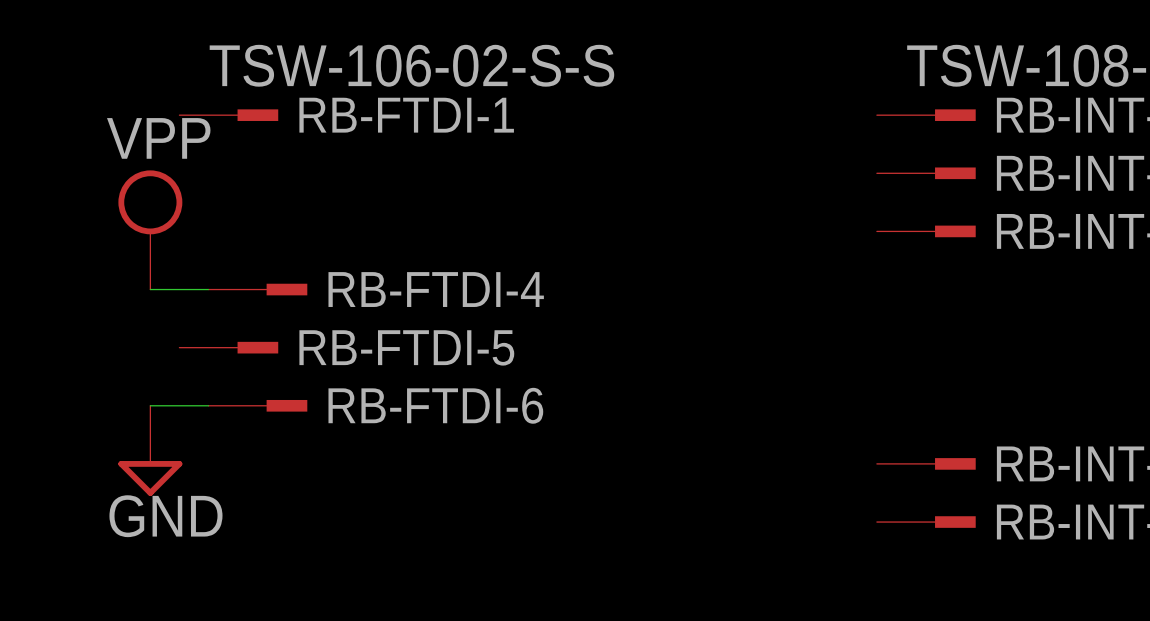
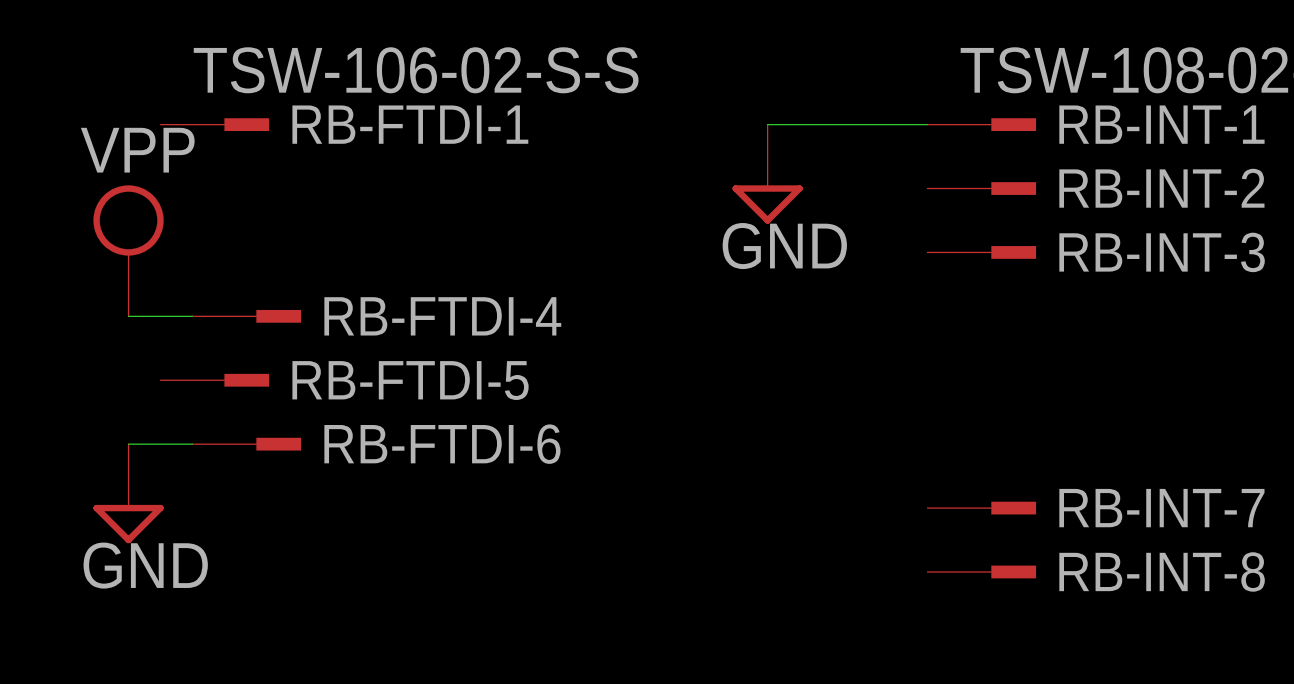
wire: none -> (767, 124) (927, 124)
power symbol: none -> GND (767, 174)

